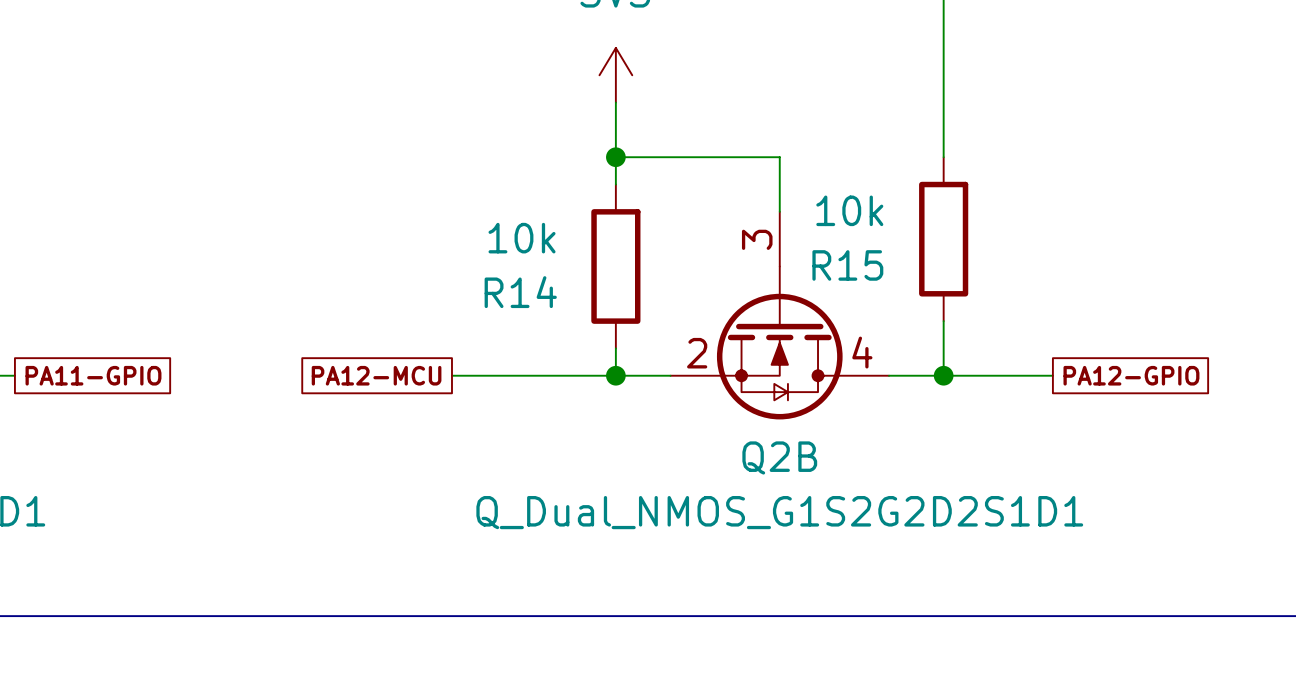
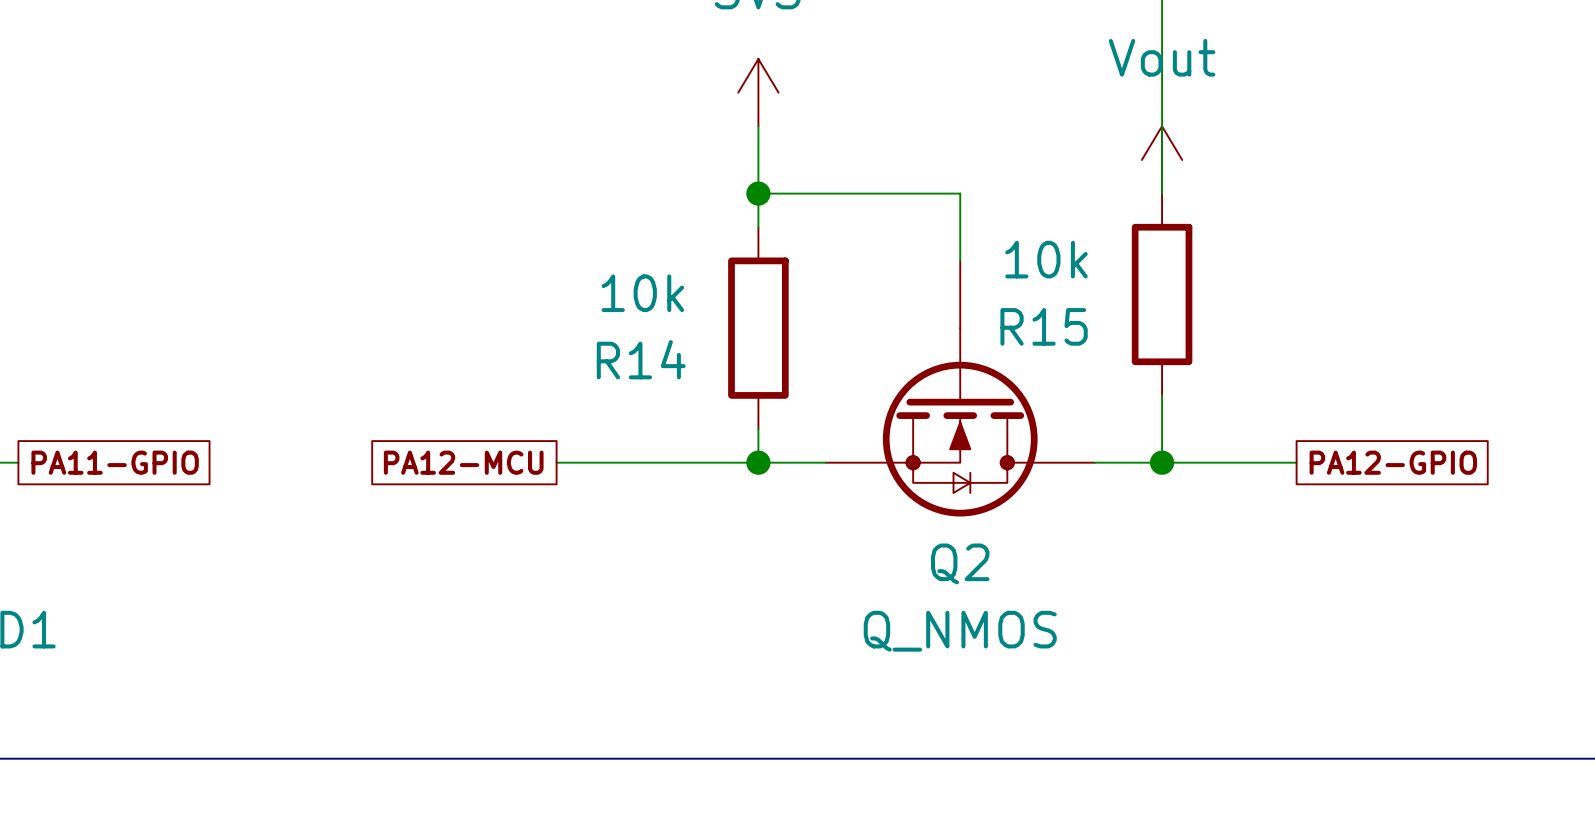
power symbol: none -> Vout (1162, 159)
Q2B pin number: 3 (757, 239) -> none
Q2B pin number: 4 (862, 352) -> none
Q2B pin number: 2 (697, 353) -> none
Q2B name: Q2B (779, 457) -> Q2 (960, 563)
Q2B value: Q_Dual_NMOS_G1S2G2D2S1D1 (779, 512) -> Q_NMOS (960, 631)

